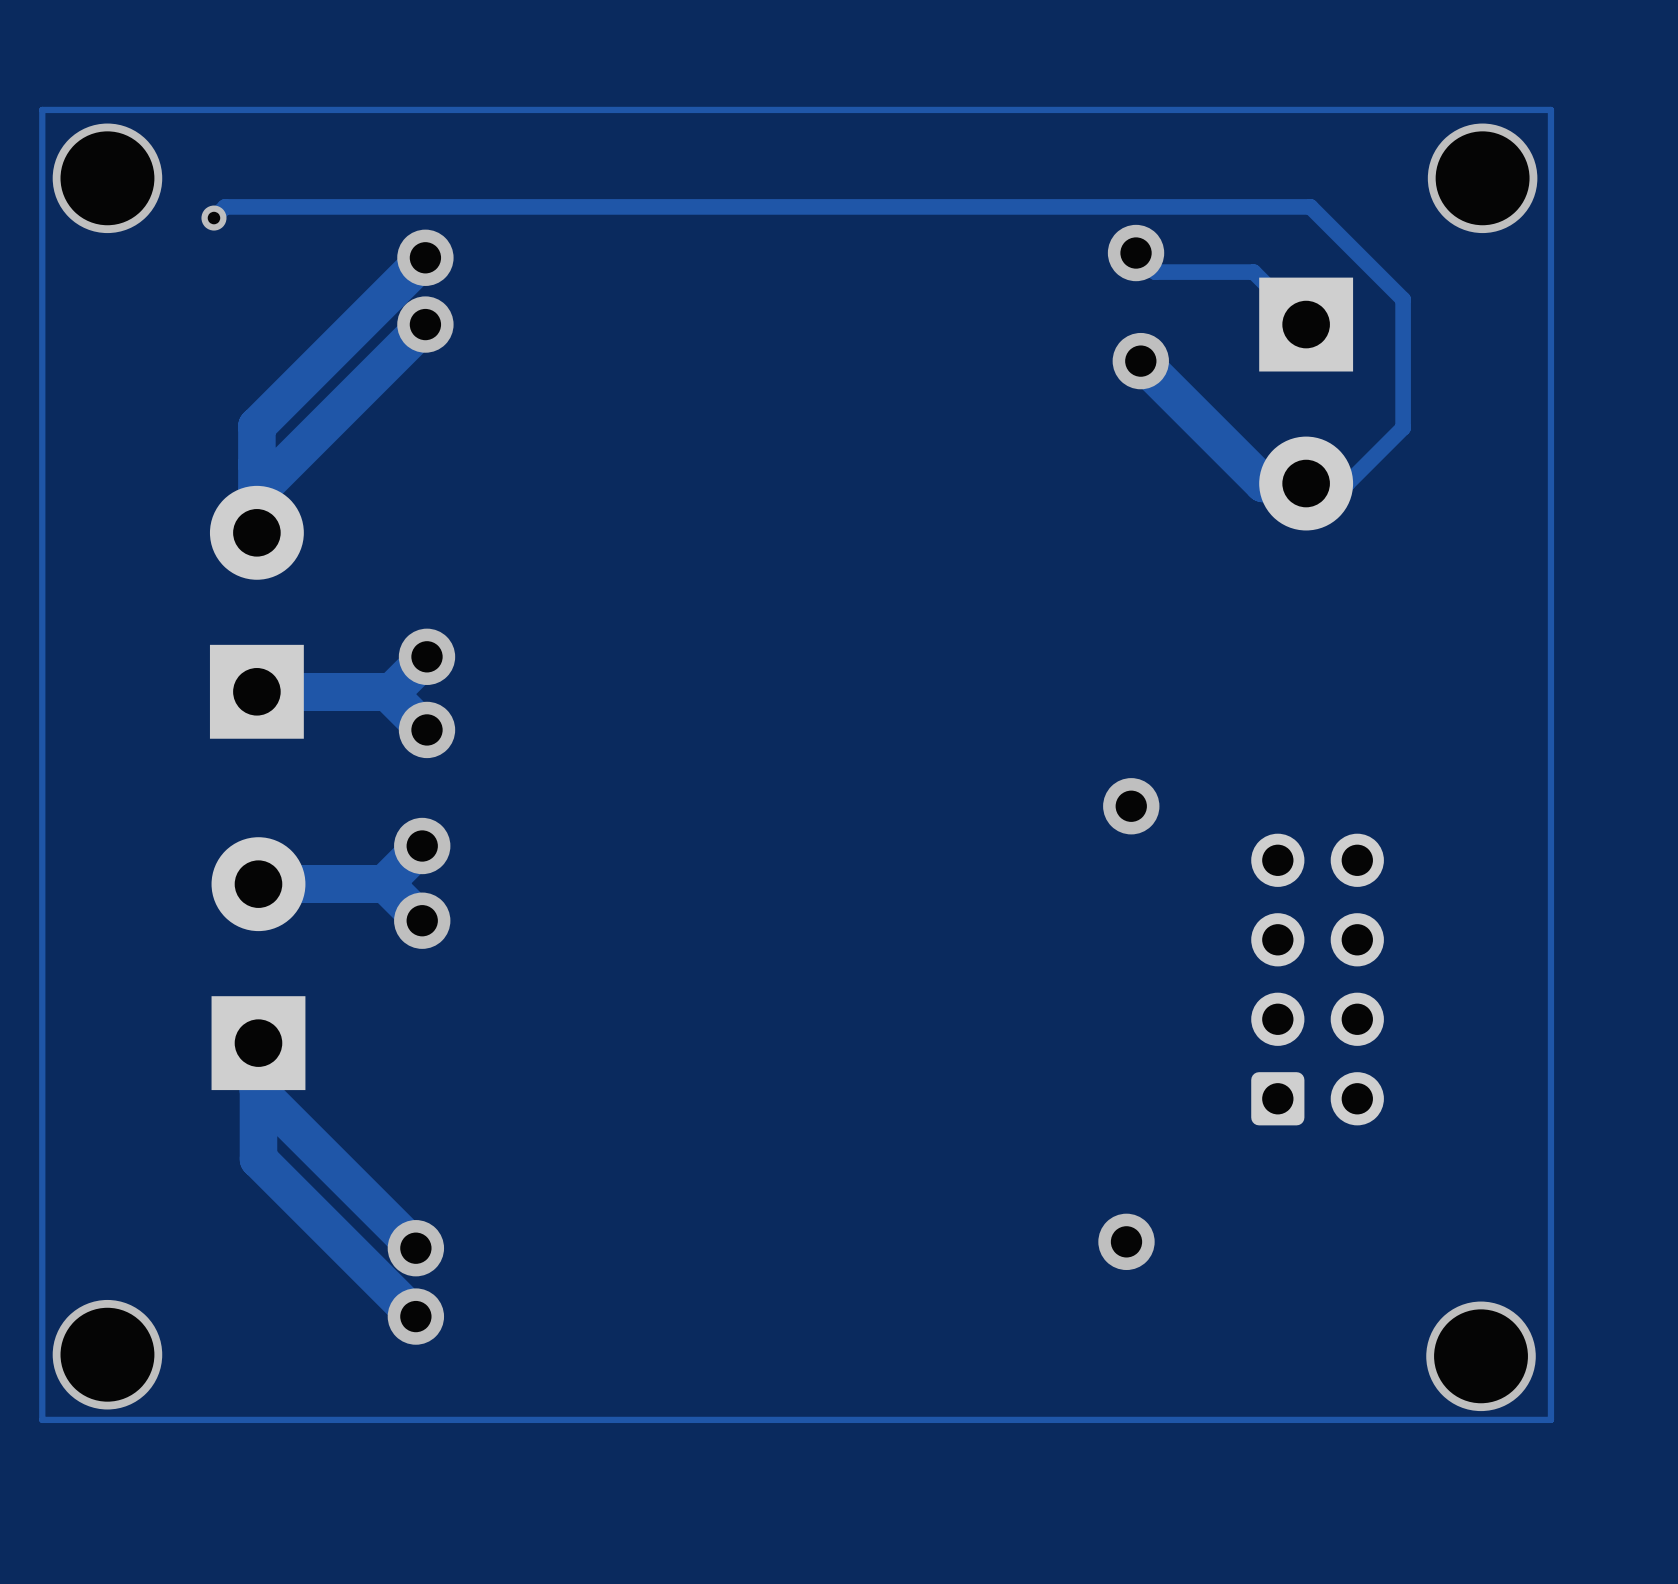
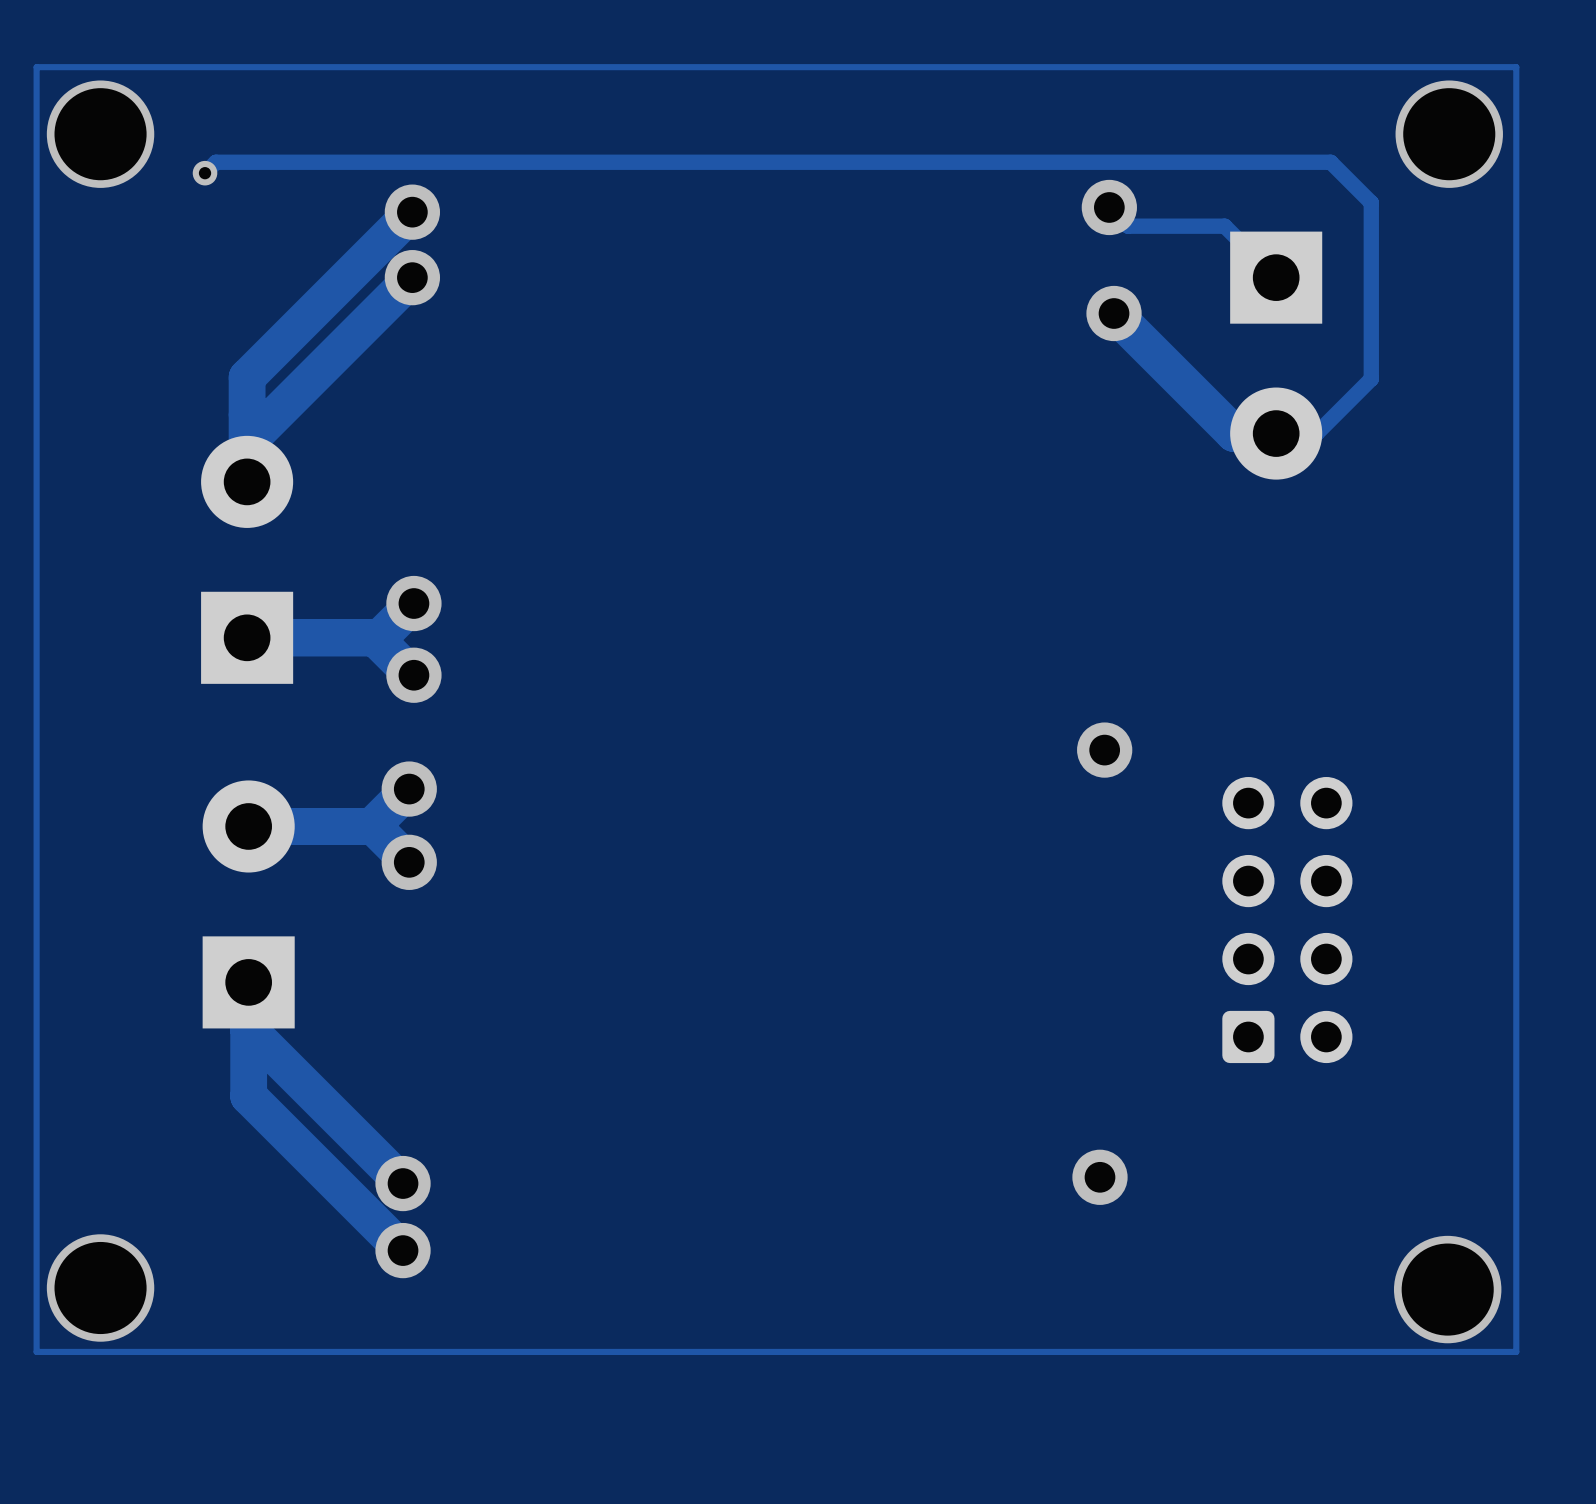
track: (1310, 206) (1403, 299) -> (1280, 162) (1330, 162) (1371, 202) (1371, 253)

